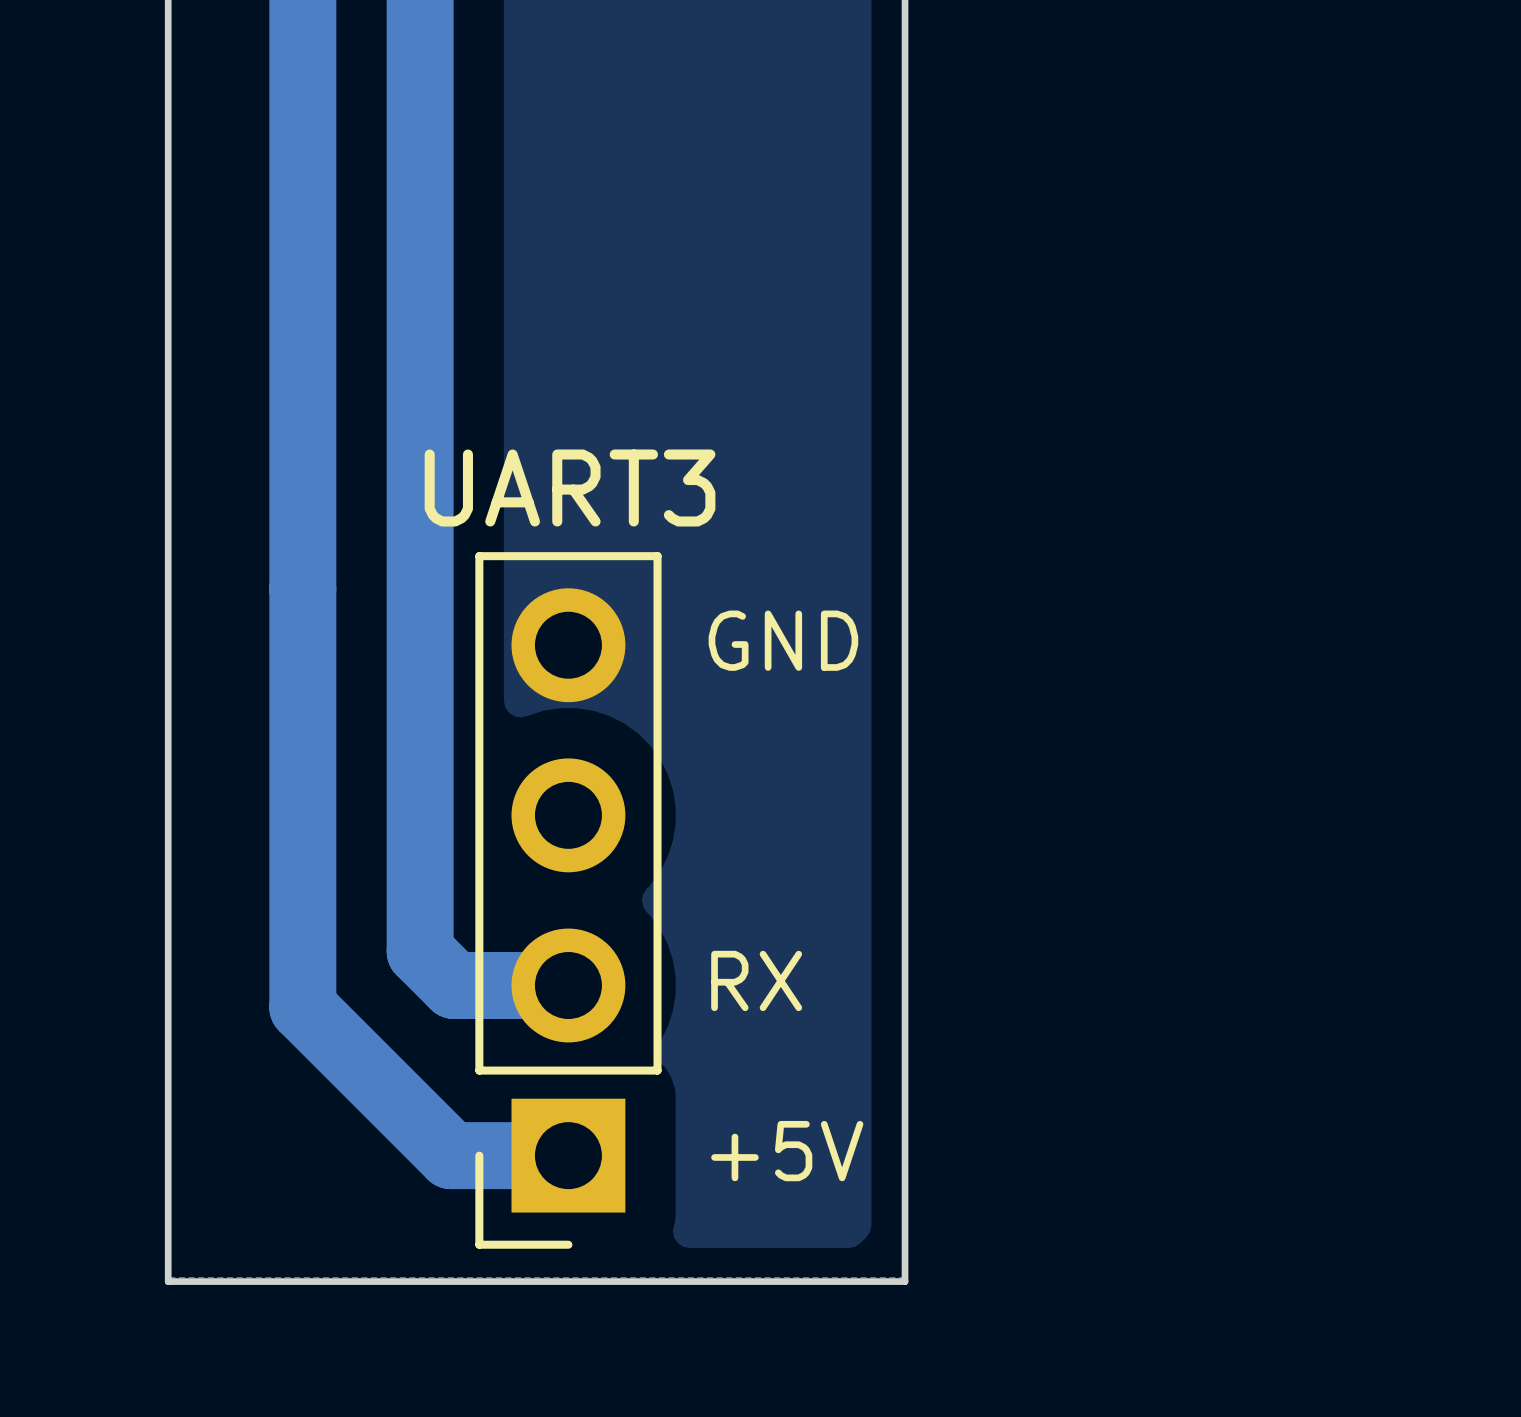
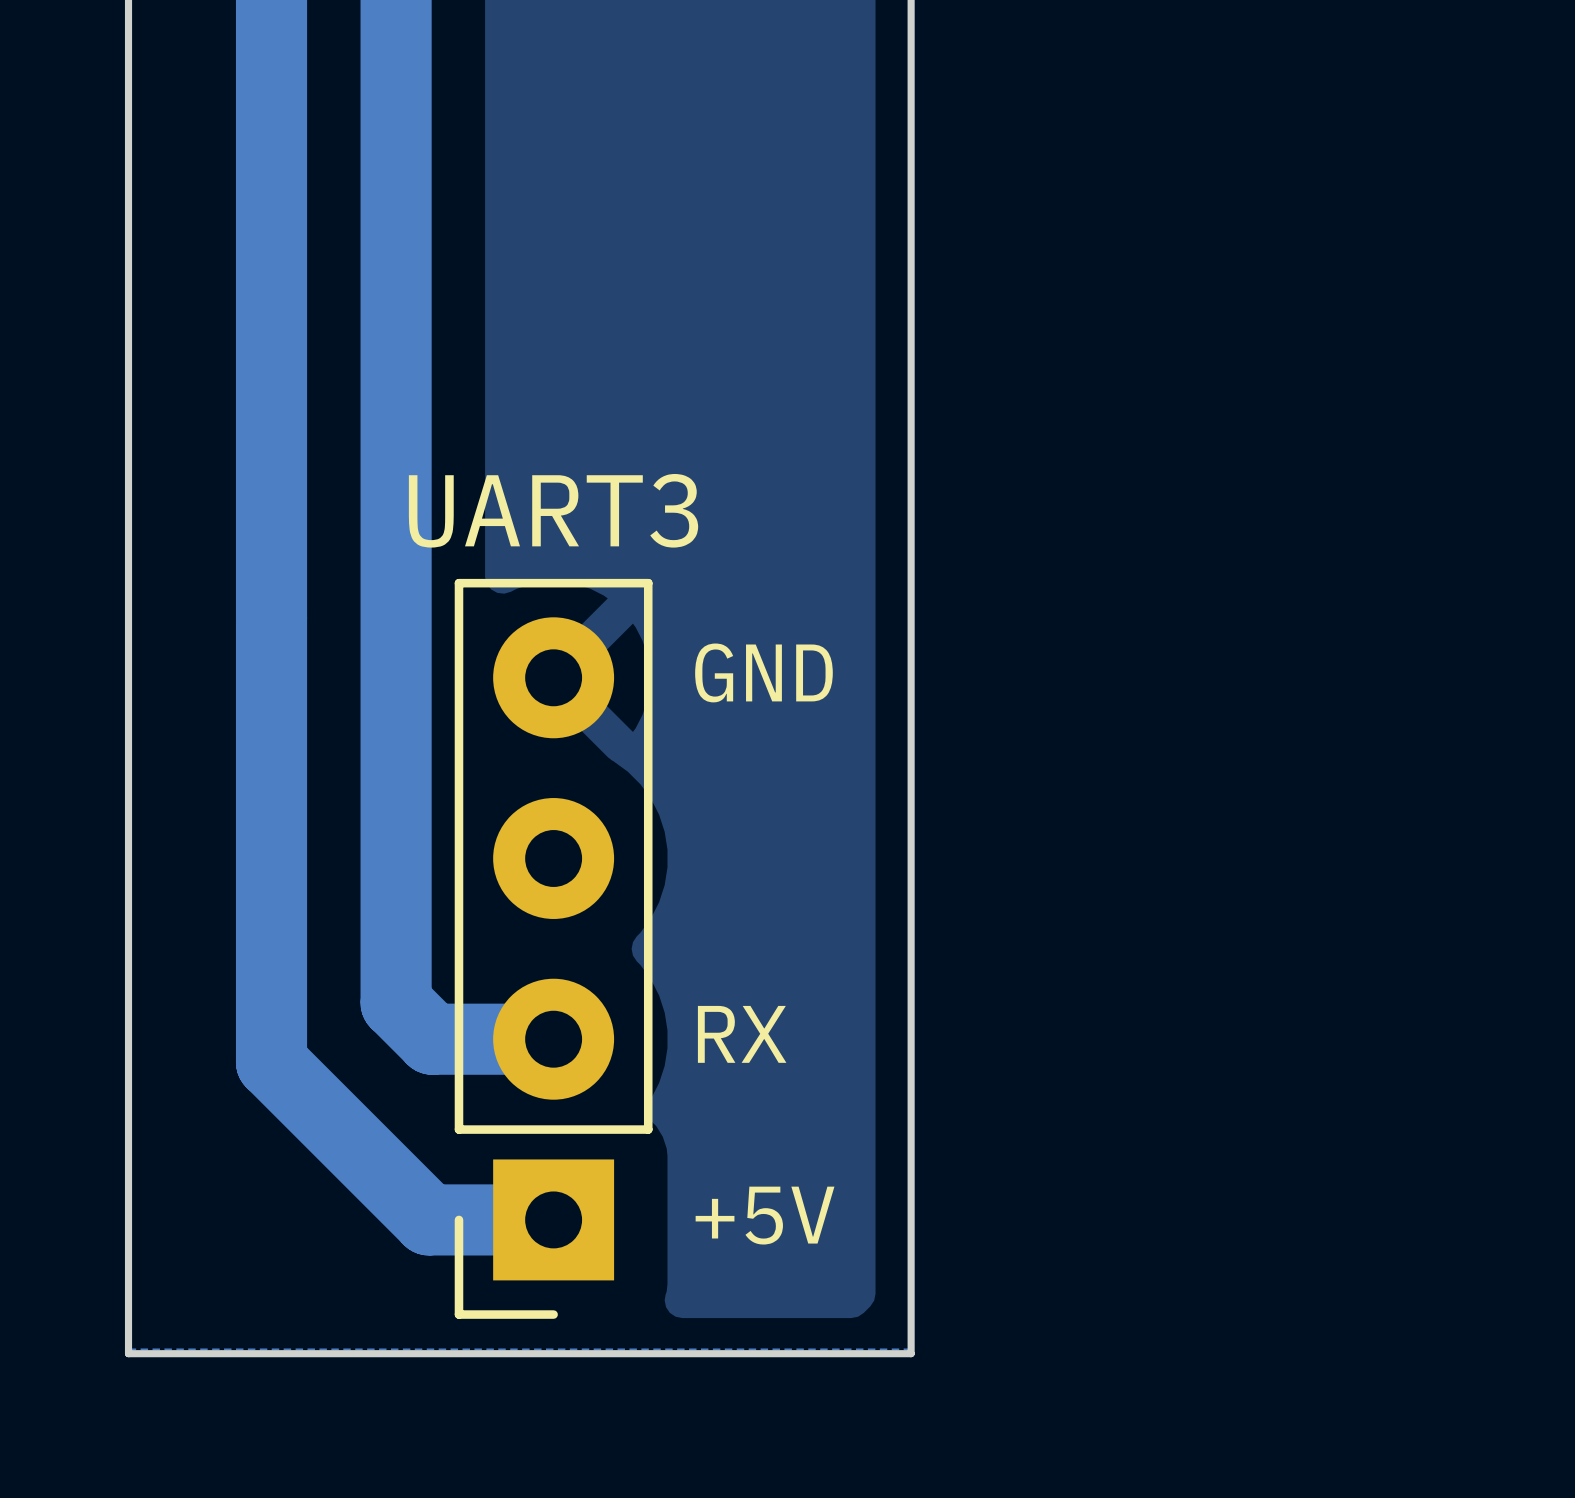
UART3 footprint: [475, 552, 662, 1249] -> [454, 578, 653, 1319]

